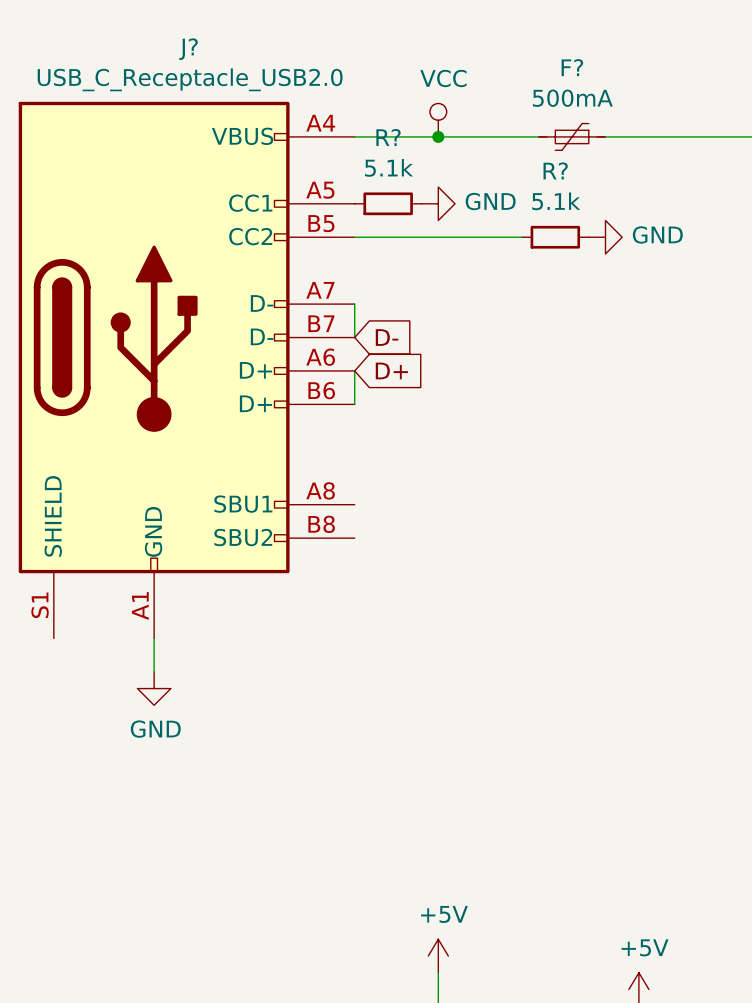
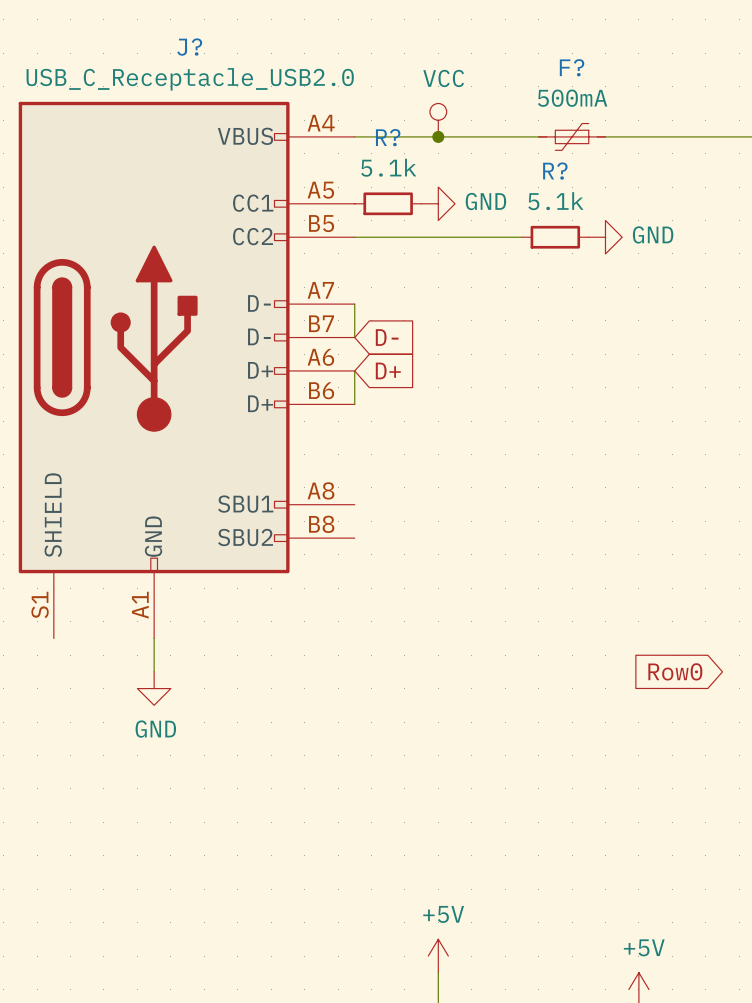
global label: none -> Row0 (675, 671)

